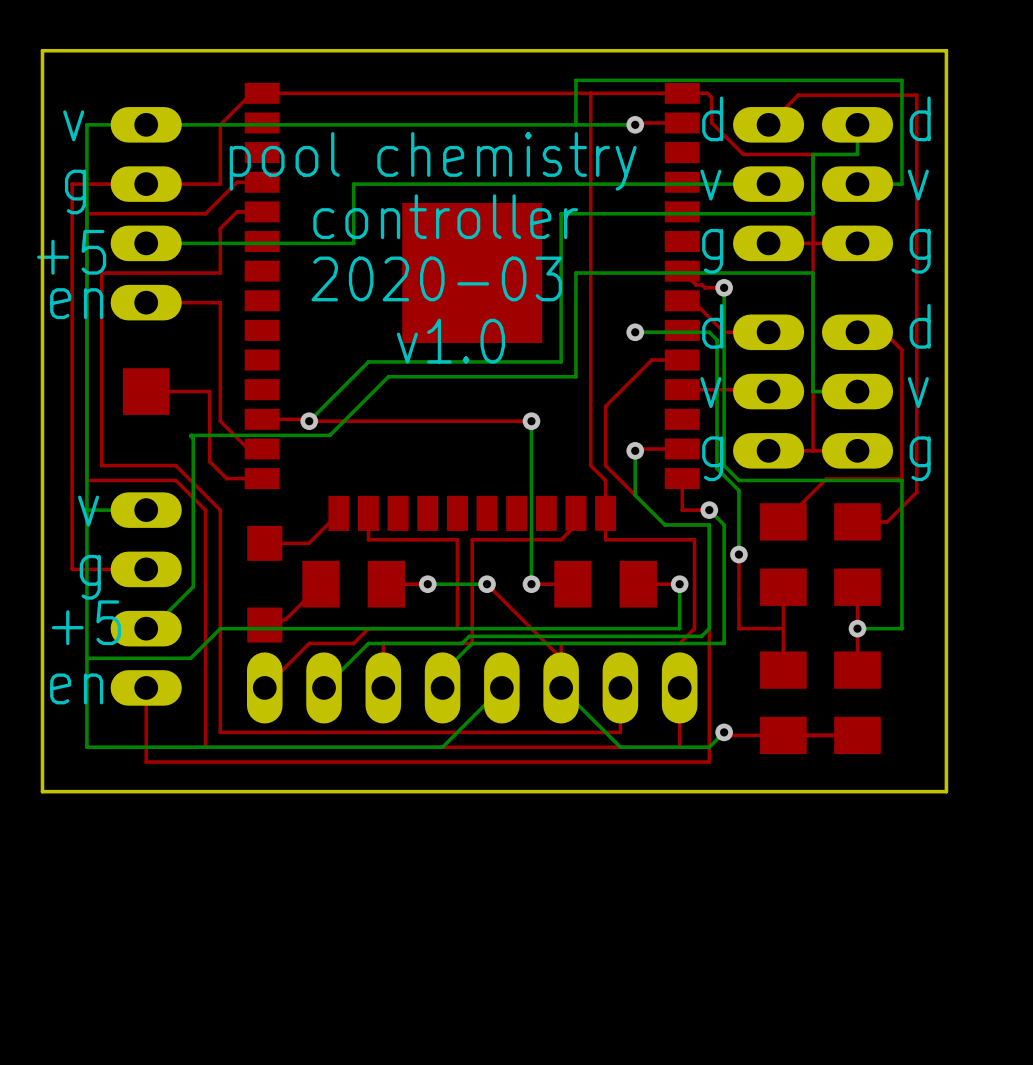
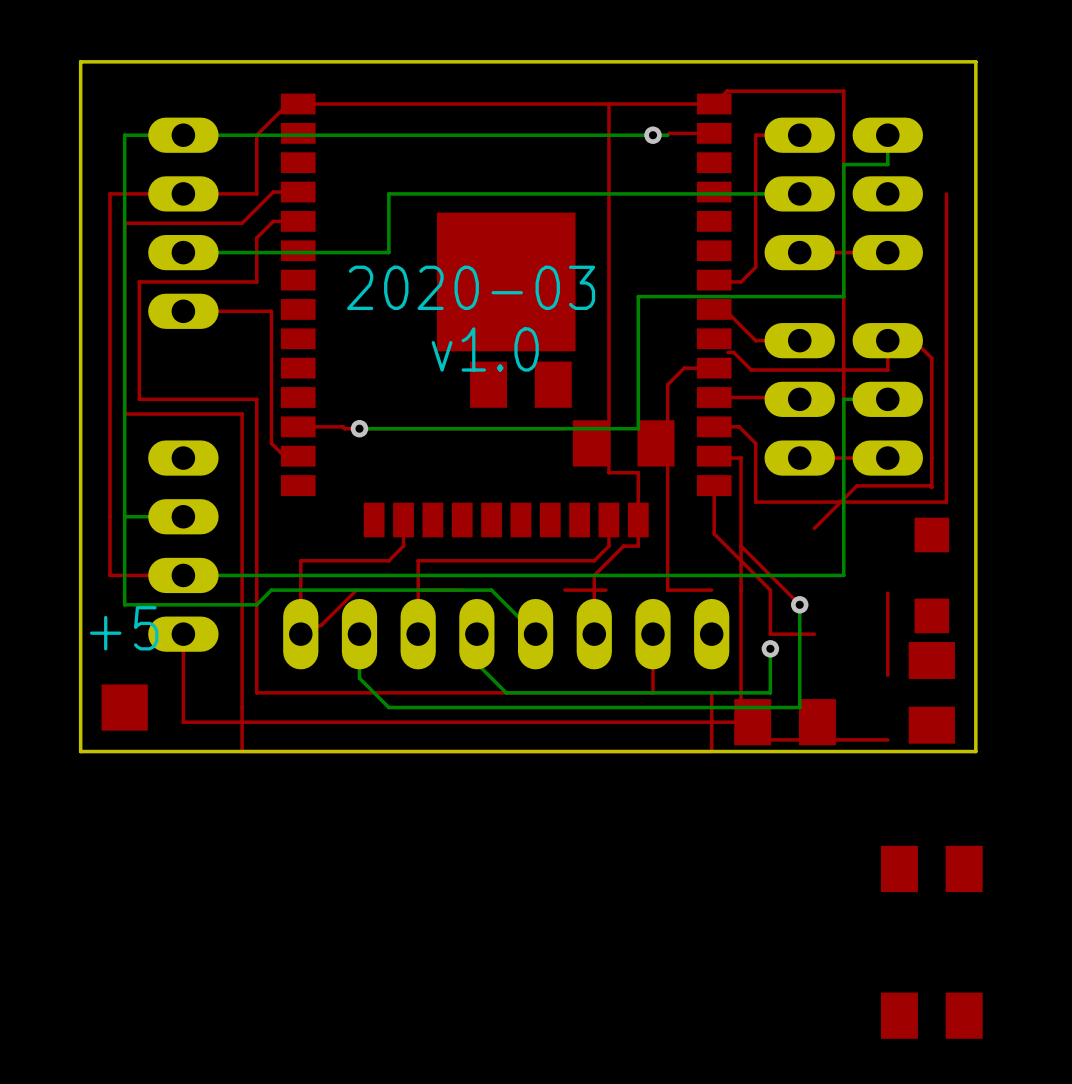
top track: (590, 93) (590, 465) (605, 480) -> (608, 104) (608, 472) (638, 472) (638, 487)
top track: (682, 93) (707, 93) (711, 97) (711, 122) (743, 154) (813, 154) -> (714, 104) (727, 91) (843, 91) (843, 164)
text: d (712, 118) -> none
text: d (920, 118) -> none
bottom track: (575, 124) (575, 80) (901, 80) (901, 184) (857, 184) -> none
via position: (635, 124) -> (652, 135)
top track: (768, 124) (798, 95) (916, 95) (916, 184) -> (799, 135) (755, 135) (755, 267) (741, 281) (716, 281)
text: v (73, 125) -> none
text: pool chemistry (433, 161) -> none
text: v (710, 185) -> none
text: v (918, 185) -> none
text: g (75, 192) -> none
bottom track: (813, 213) (561, 213) (561, 361) (368, 361) (309, 421) -> (843, 223) (843, 281)
text: controller (445, 216) -> none
text: g (712, 251) -> none
text: g (920, 251) -> none
text: +5 (71, 252) -> none
top track: (682, 271) (696, 284) (701, 284) (704, 287) (724, 287) -> none
bottom track: (813, 273) (575, 273) (575, 376) (388, 376) (329, 435) (191, 435) (193, 438) (193, 586) (151, 628) (146, 628) -> none
bottom track: (724, 287) (724, 465) (738, 480) (901, 480) (901, 628) (857, 628) -> none
via: (724, 287) -> none
bottom track: (813, 287) (813, 391) -> (843, 296) (638, 296) (638, 428) (359, 428)
top track: (220, 302) (220, 391) -> (256, 311) (271, 311) (271, 443)
text: en (76, 303) -> none
text: d (712, 326) -> none
text: d (920, 326) -> none
bottom track: (635, 332) (709, 332) (717, 339) (717, 468) (738, 490) (738, 554) -> none
via: (635, 332) -> none
top track: none -> (887, 340) (887, 370) (751, 370) (733, 352) (727, 352)
part: none -> (520, 384)
top track: (635, 376) (605, 406) (605, 465) (664, 524) (709, 524) -> (714, 456) (716, 458) (741, 458) (741, 531)
top track: (101, 391) (101, 465) (175, 465) (220, 510) -> (139, 399) (183, 399)
part position: (146, 391) -> (124, 707)
top track: (209, 391) (209, 461) (226, 478) (262, 478) -> (246, 399) (256, 399)
bottom track: none -> (843, 399) (843, 575) (183, 575)
text: v (710, 392) -> none
text: v (918, 392) -> none
top track: (86, 406) (86, 480) (175, 480) (205, 510) -> (124, 414) (242, 414) (242, 516)
top track: (220, 421) (235, 436) -> (256, 428) (256, 516)
via position: (309, 421) -> (359, 428)
bottom track: (531, 421) (531, 584) -> none
via: (531, 421) -> none
part: none -> (623, 443)
top track: (682, 448) (635, 448) -> (667, 384) (667, 456)
top track: none -> (667, 458) (667, 590) (670, 590)
bottom track: (635, 450) (635, 495) (664, 524) (709, 524) (709, 628) (701, 636) (469, 636) (462, 643) (368, 643) (324, 687) -> none
via: (635, 450) -> none
text: g (712, 458) -> none
text: g (920, 458) -> none
top track: (916, 492) (887, 521) (857, 521) -> (946, 499) (946, 502) (755, 502) (755, 443) (739, 426) (714, 426)
top track: (709, 510) (682, 510) -> none
bottom track: (709, 510) (724, 524) (724, 643) (472, 643) (442, 673) (442, 687) -> none
via: (709, 510) -> none
text: v (88, 511) -> none
top track: (338, 513) (308, 543) (264, 543) -> none
top track: (575, 524) (561, 539) (472, 539) (472, 643) (383, 643) (383, 687) -> (608, 531) (608, 546) (594, 560) (418, 560) (418, 634)
top track: (368, 539) (457, 539) (457, 628) (368, 628) (353, 643) (309, 643) (264, 687) -> (403, 546) (388, 560) (300, 560) (300, 634)
top track: (605, 539) (694, 539) (694, 628) (679, 643) (561, 643) (561, 687) -> (638, 546) (623, 546) (594, 575) (594, 634)
top track: none -> (741, 546) (799, 604)
top track: (738, 554) (738, 584) -> (714, 516) (714, 533) (770, 590)
via: (738, 554) -> none
part: (783, 554) -> none
part: (857, 554) -> none
part: none -> (931, 575)
text: g (90, 577) -> none
part: (264, 584) -> none
part: (353, 584) -> none
via: (427, 584) -> none
top track: (487, 584) (561, 658) -> none
bottom track: (487, 584) (457, 584) -> (535, 634) (491, 590)
via: (487, 584) -> none
via: (531, 584) -> none
part: (605, 584) -> none
bottom track: (679, 584) (679, 628) (220, 628) (190, 658) (86, 658) -> none
via: (679, 584) -> none
top track: (783, 587) (783, 670) -> none
bottom track: (86, 599) (86, 747) (442, 747) (501, 687) -> (124, 604) (256, 604) (271, 590) (462, 590)
part position: (146, 599) -> (183, 546)
bottom track: none -> (799, 604) (799, 707) (388, 707) (359, 678) (359, 634)
via: none -> (799, 604)
top track: none -> (183, 634) (183, 692)
bottom track: none -> (476, 634) (476, 663) (506, 692) (770, 692) (770, 648)
via: (857, 628) -> none
via: none -> (770, 648)
part position: (353, 687) -> (388, 634)
bottom track: (561, 687) (620, 747) (709, 747) (724, 732) -> none
part position: (590, 687) -> (623, 634)
top track: (620, 687) (620, 732) (220, 732) (220, 687) -> (652, 634) (652, 692) (256, 692)
text: en (76, 688) -> none
part rotation: 0° (783, 702) -> 90° clockwise (785, 722)
part position: (857, 702) -> (931, 692)
top track: (709, 717) (709, 762) (146, 762) (146, 717) -> (741, 722) (183, 722)
via: (724, 732) -> none
board edge: (946, 747) (946, 791) (42, 791) (42, 747) -> (975, 751) (80, 751)
part: none -> (931, 868)
part: none -> (931, 1015)

